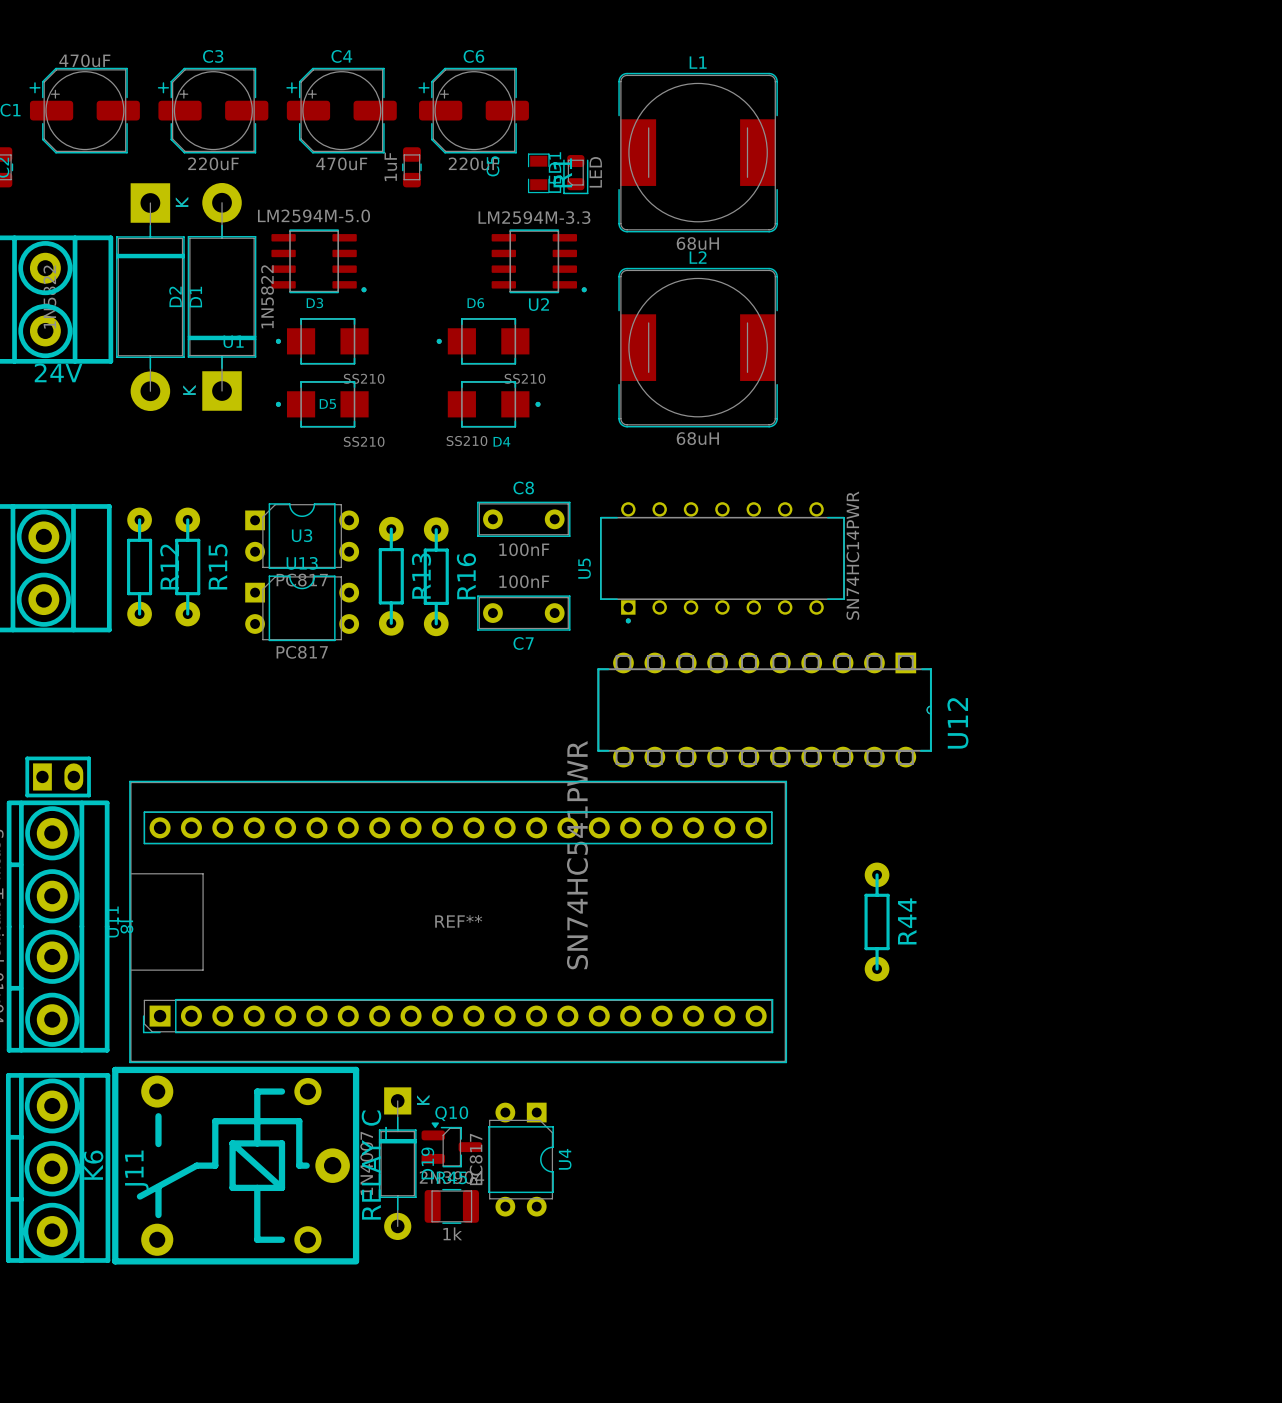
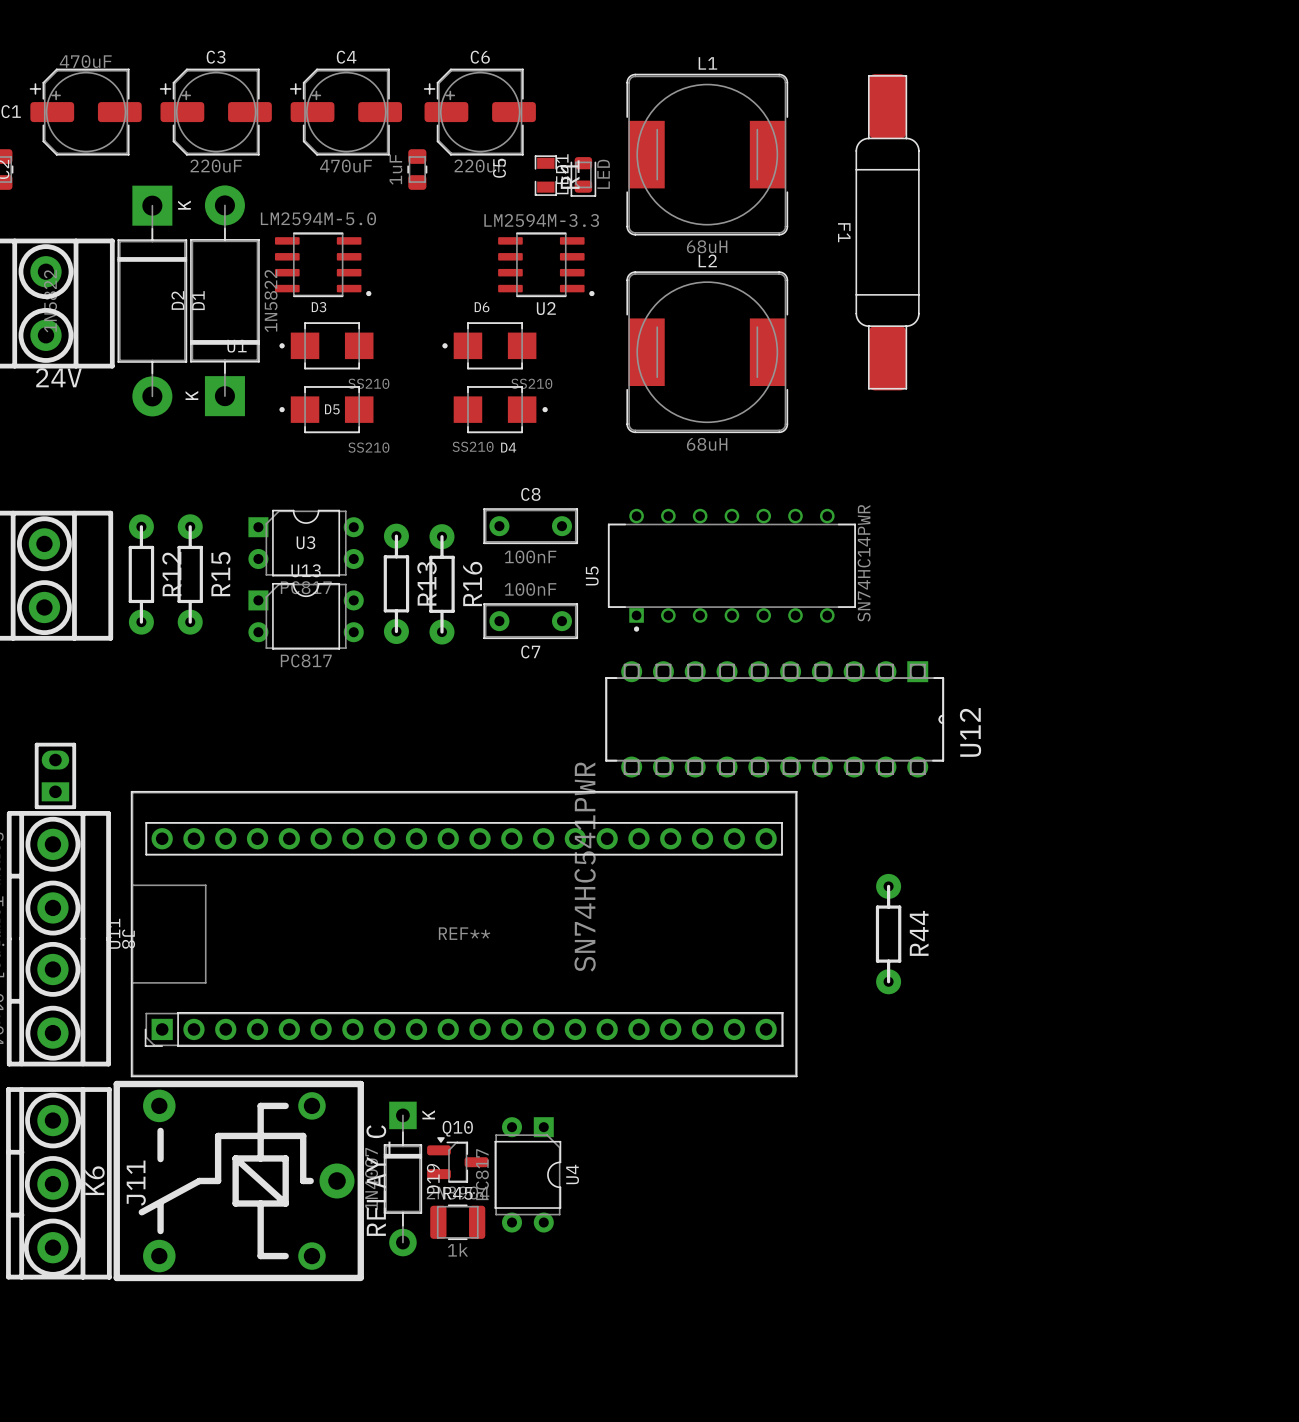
F1: none -> (887, 232)
part rotation: 0° (58, 776) -> 90° counterclockwise (55, 775)

